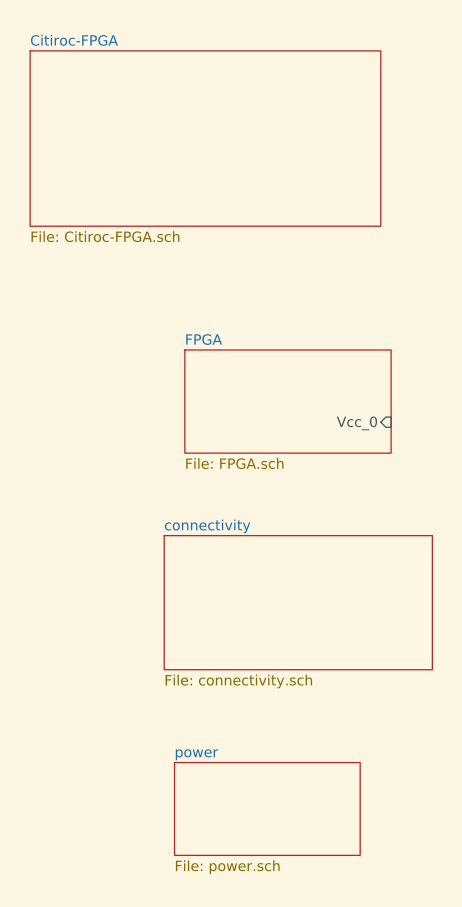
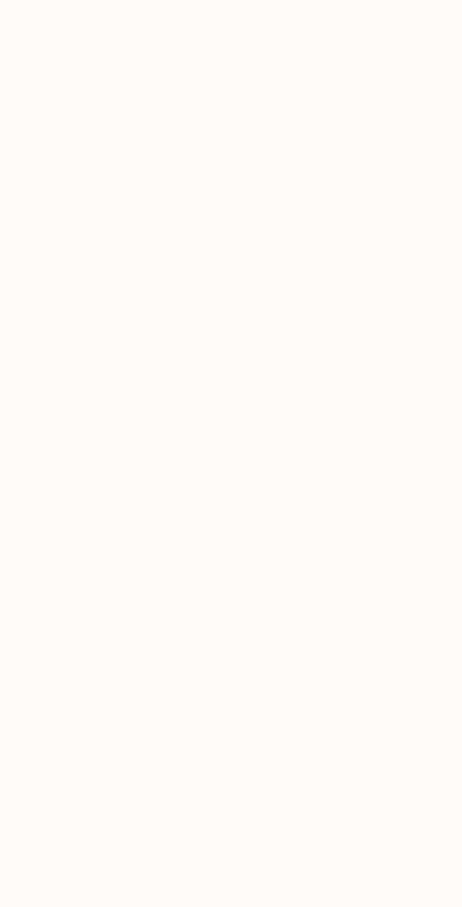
sheet Citiroc-FPGA: File: Citiroc-FPGA.sch (205, 138) -> none
sheet FPGA: File: FPGA.sch (287, 401) -> none
sheet pin: Vcc_0 (356, 423) -> none
sheet connectivity: File: connectivity.sch (298, 602) -> none
sheet power: File: power.sch (267, 808) -> none

